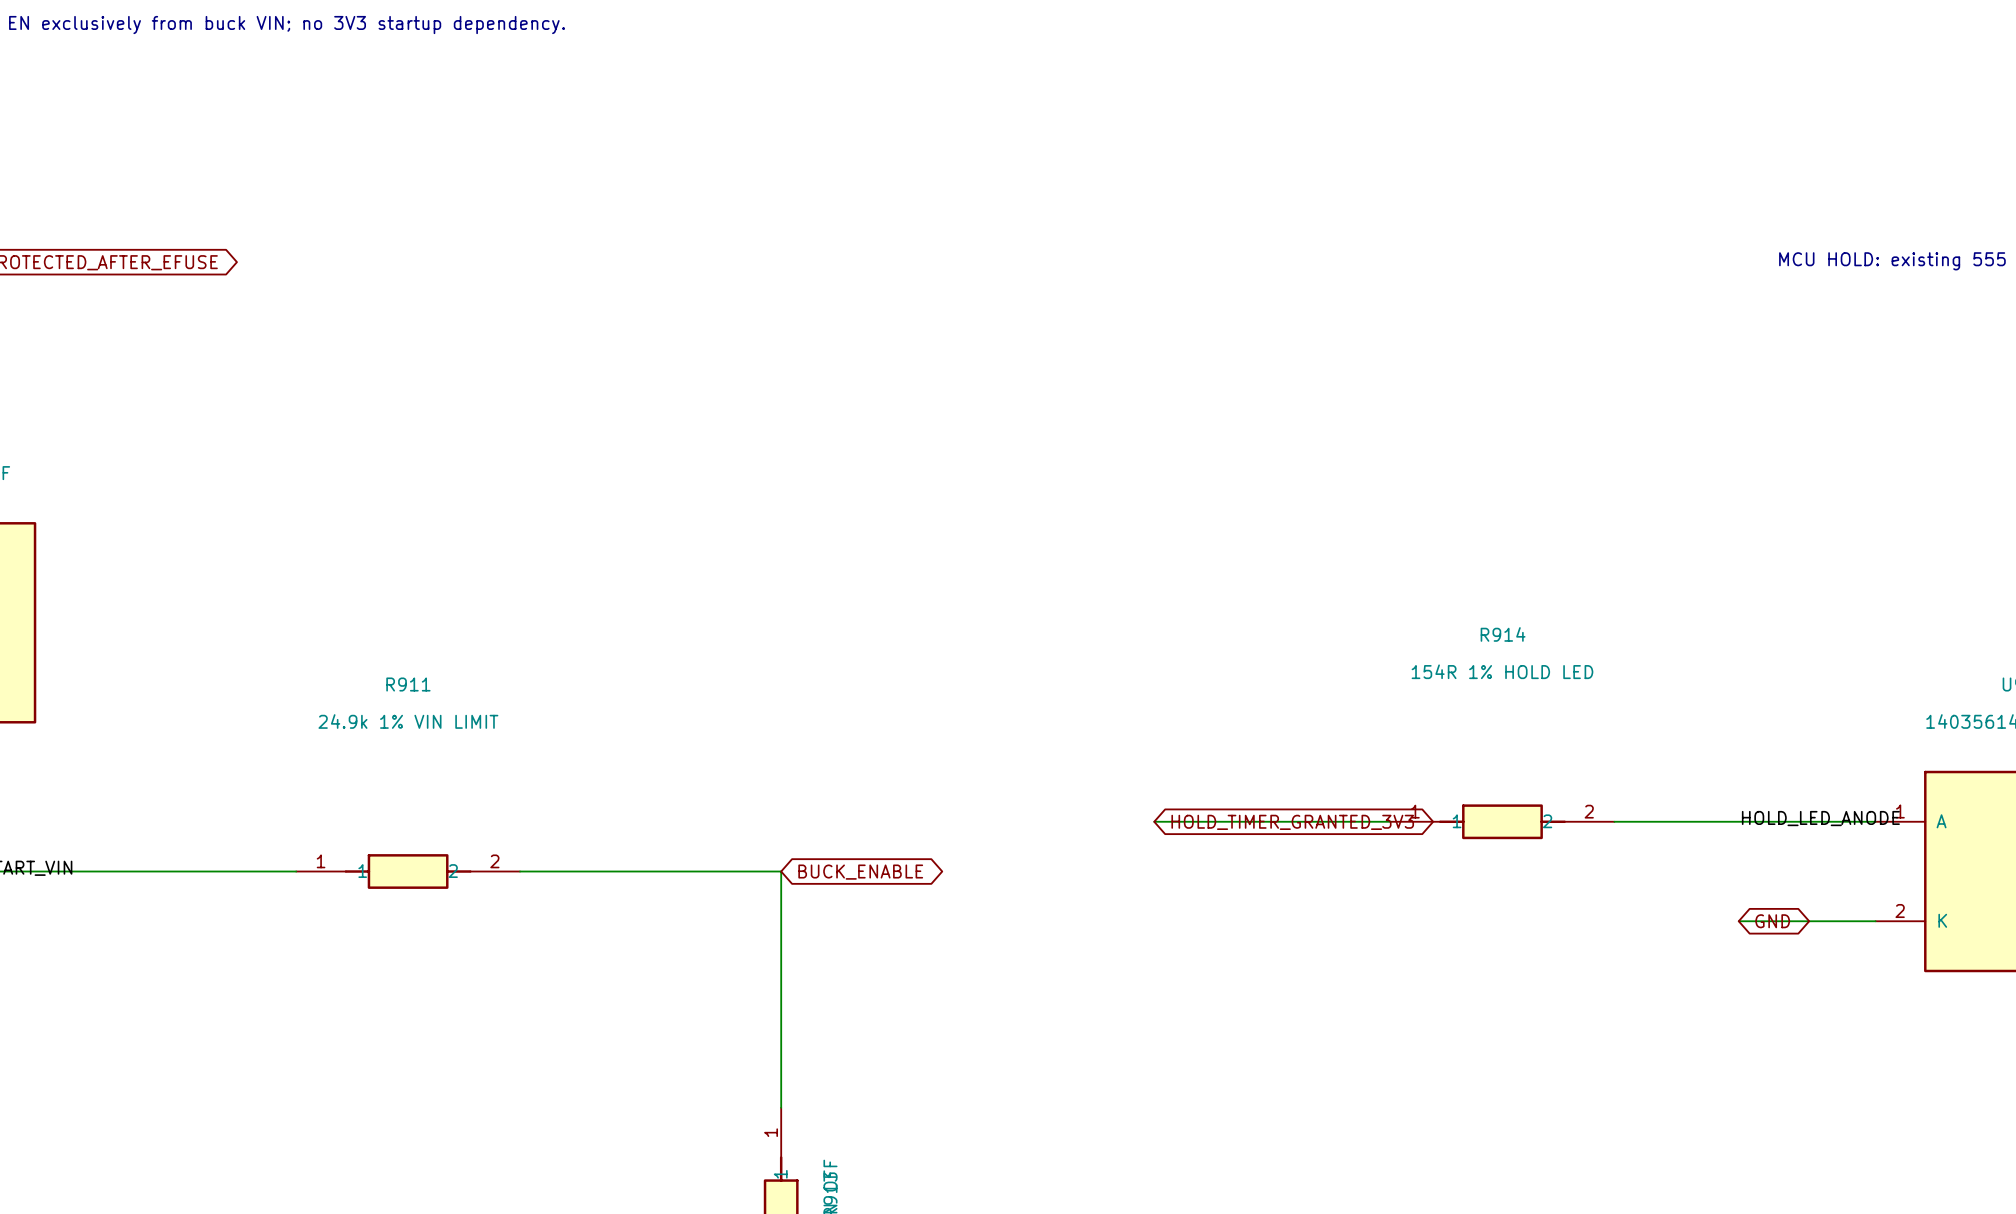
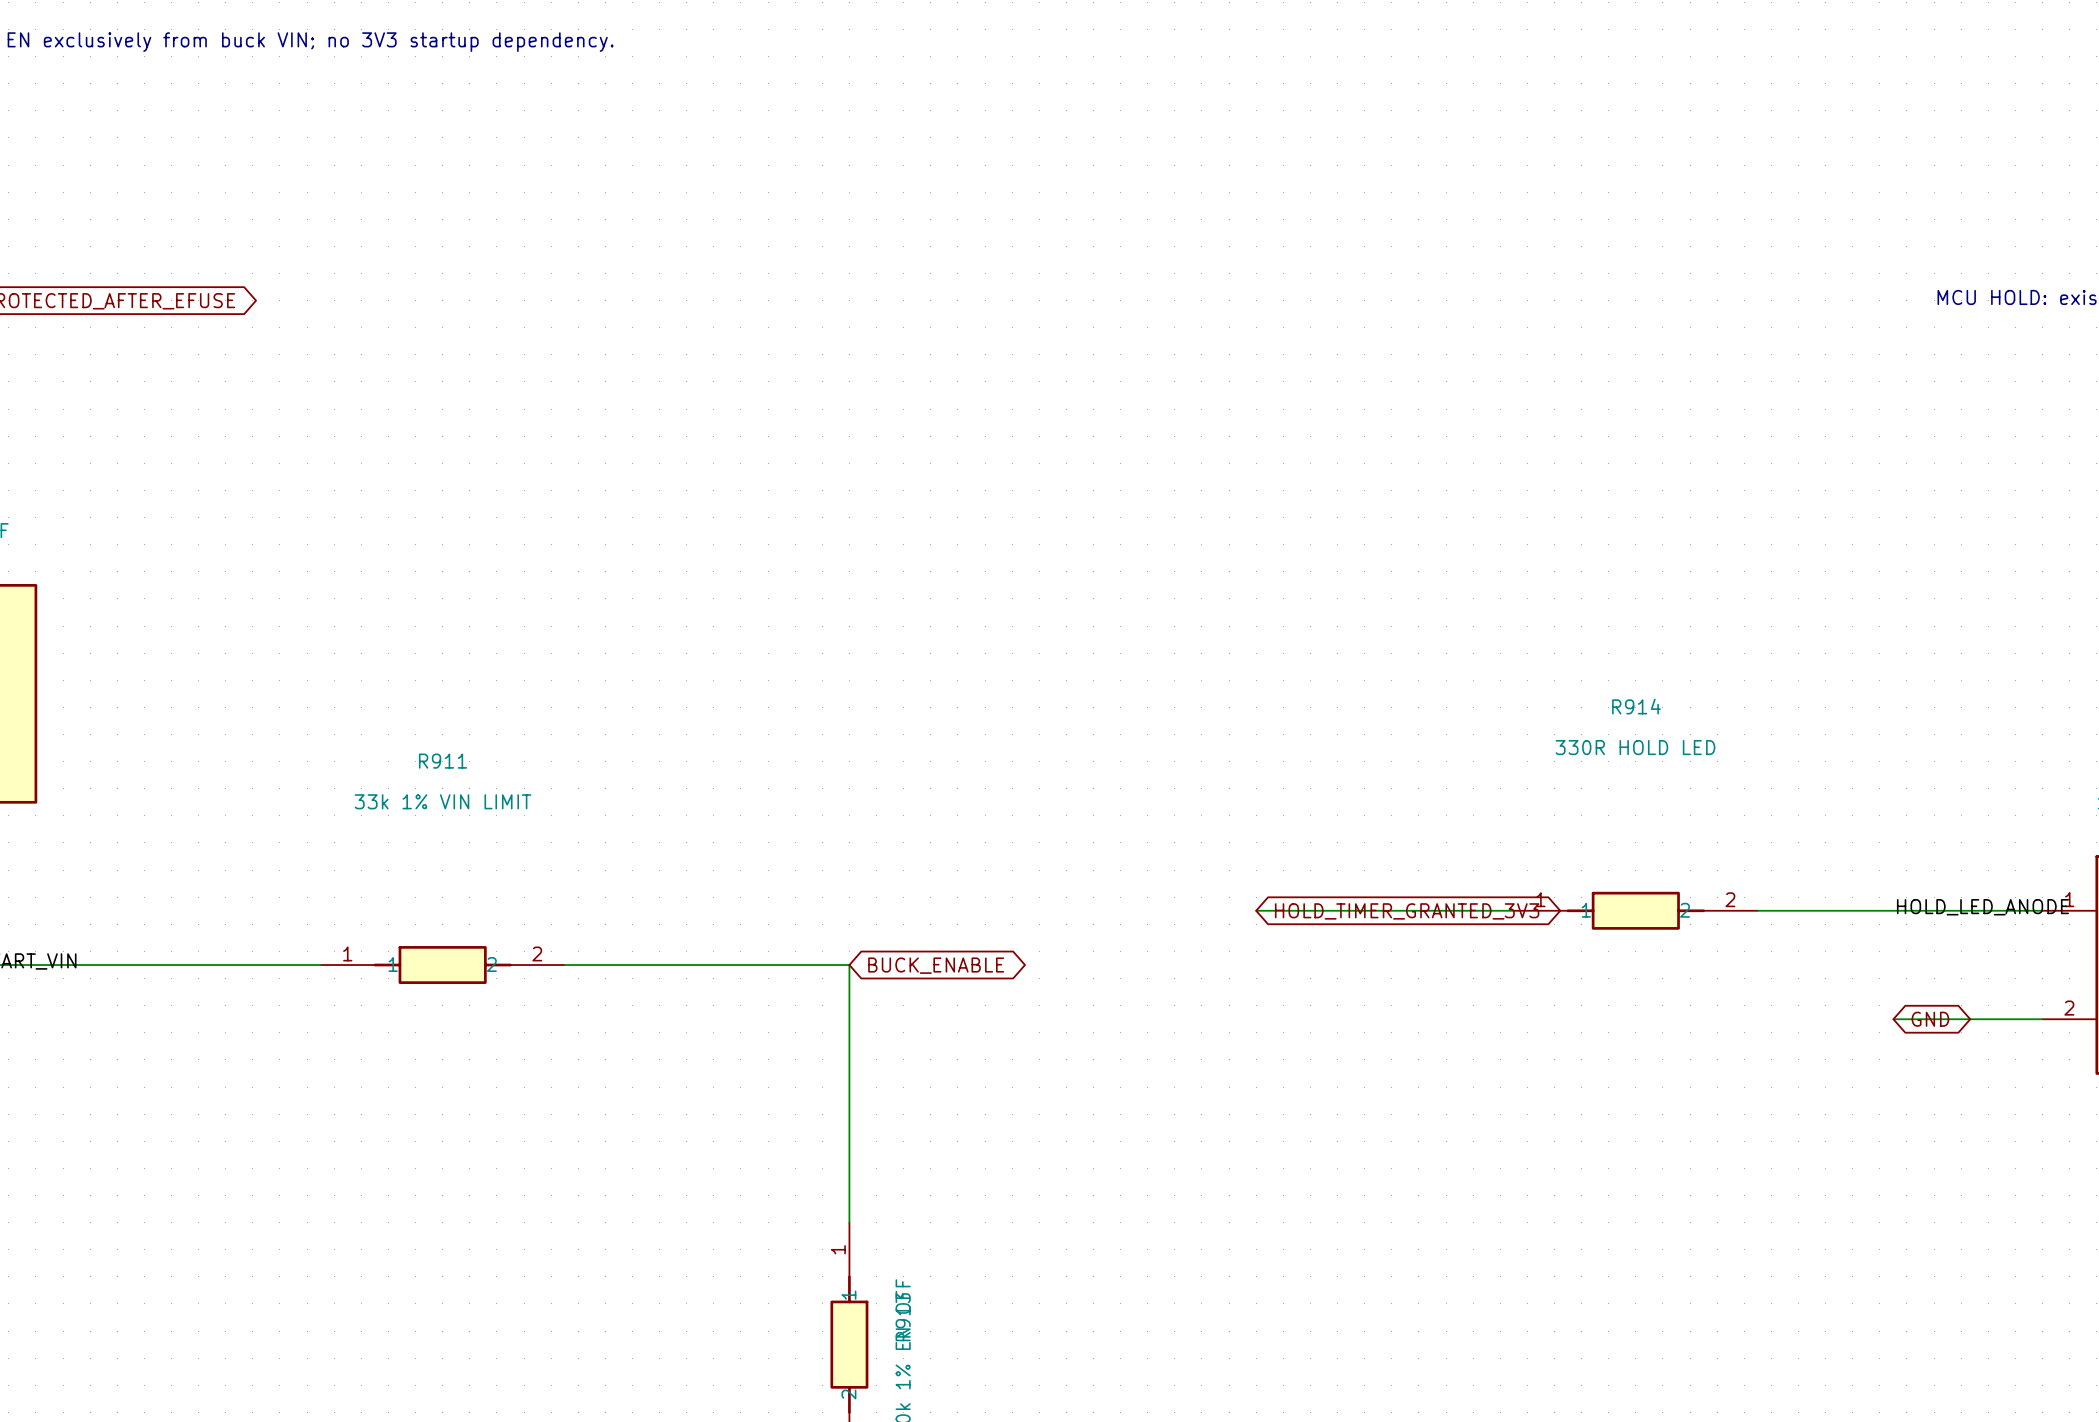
R914 value: 154R 1% HOLD LED (1502, 671) -> 330R HOLD LED (1635, 747)
R911 value: 24.9k 1% VIN LIMIT (408, 721) -> 33k 1% VIN LIMIT (442, 801)

